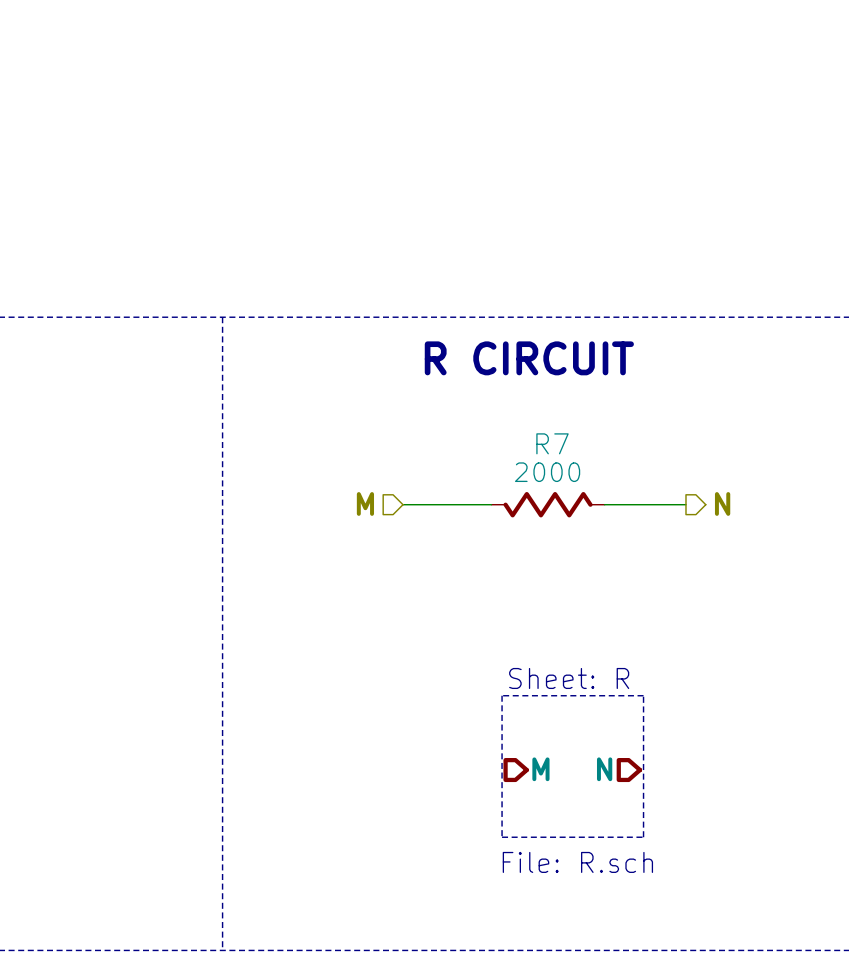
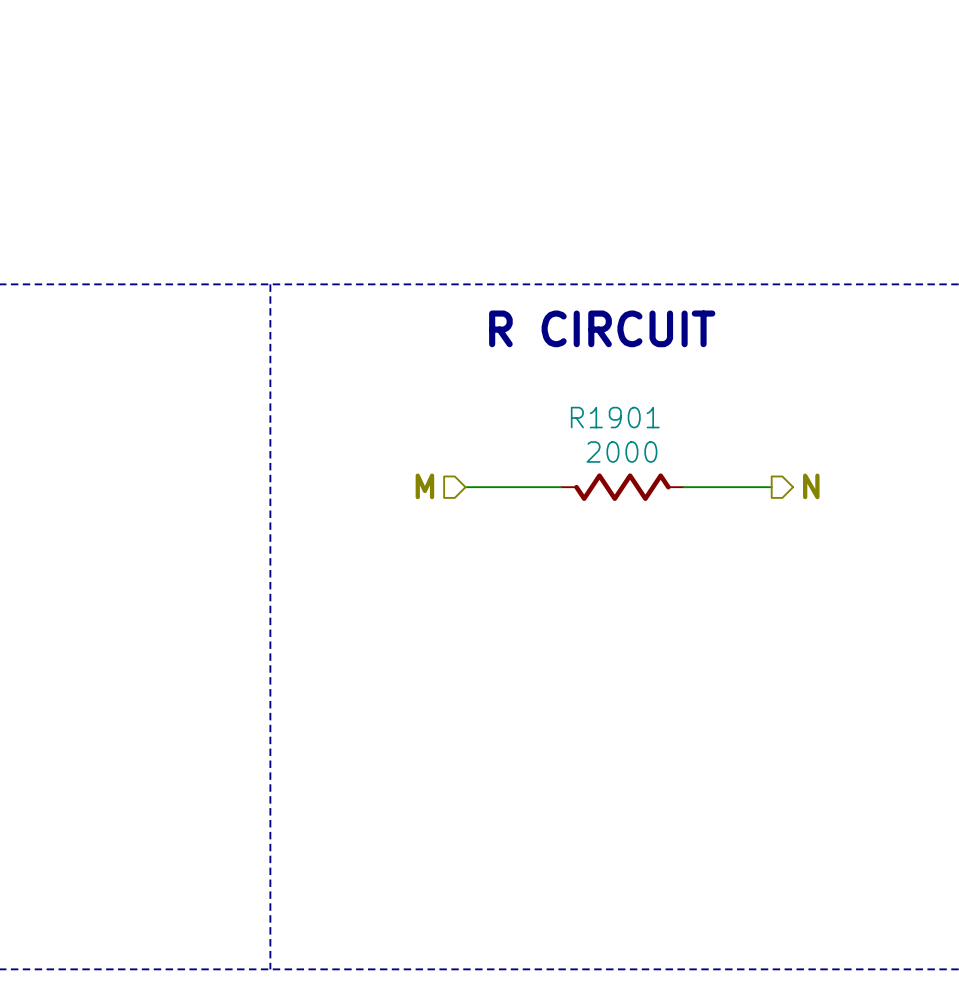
R1901 name: none -> R1901 (615, 417)
R1901 text: R7 (552, 443) -> none
text: Sheet: R (569, 678) -> none
line: (502, 695) (643, 695) (643, 837) (502, 837) (502, 695) -> none
part: (516, 770) -> none
part: (629, 770) -> none
text: File: R.sch (577, 862) -> none

